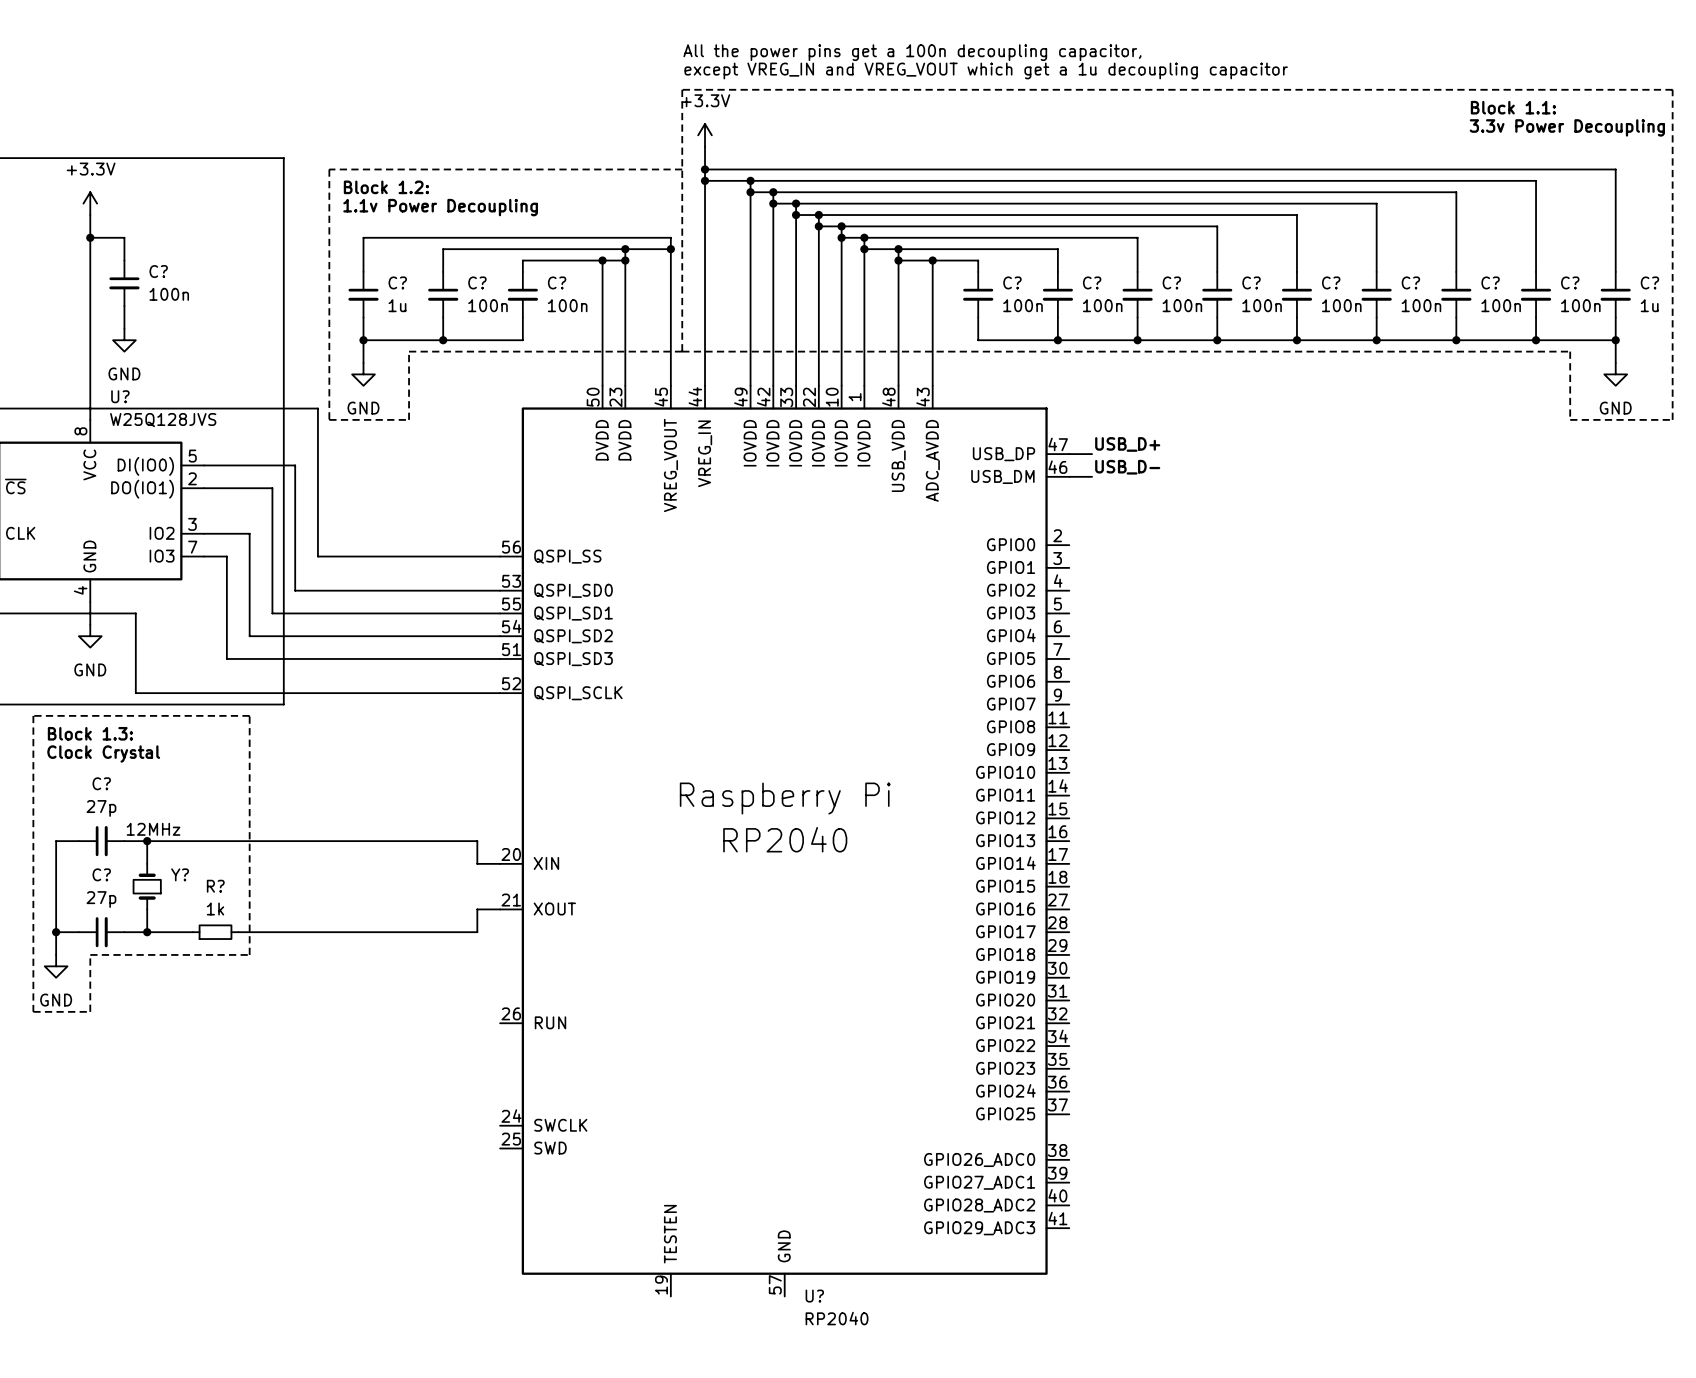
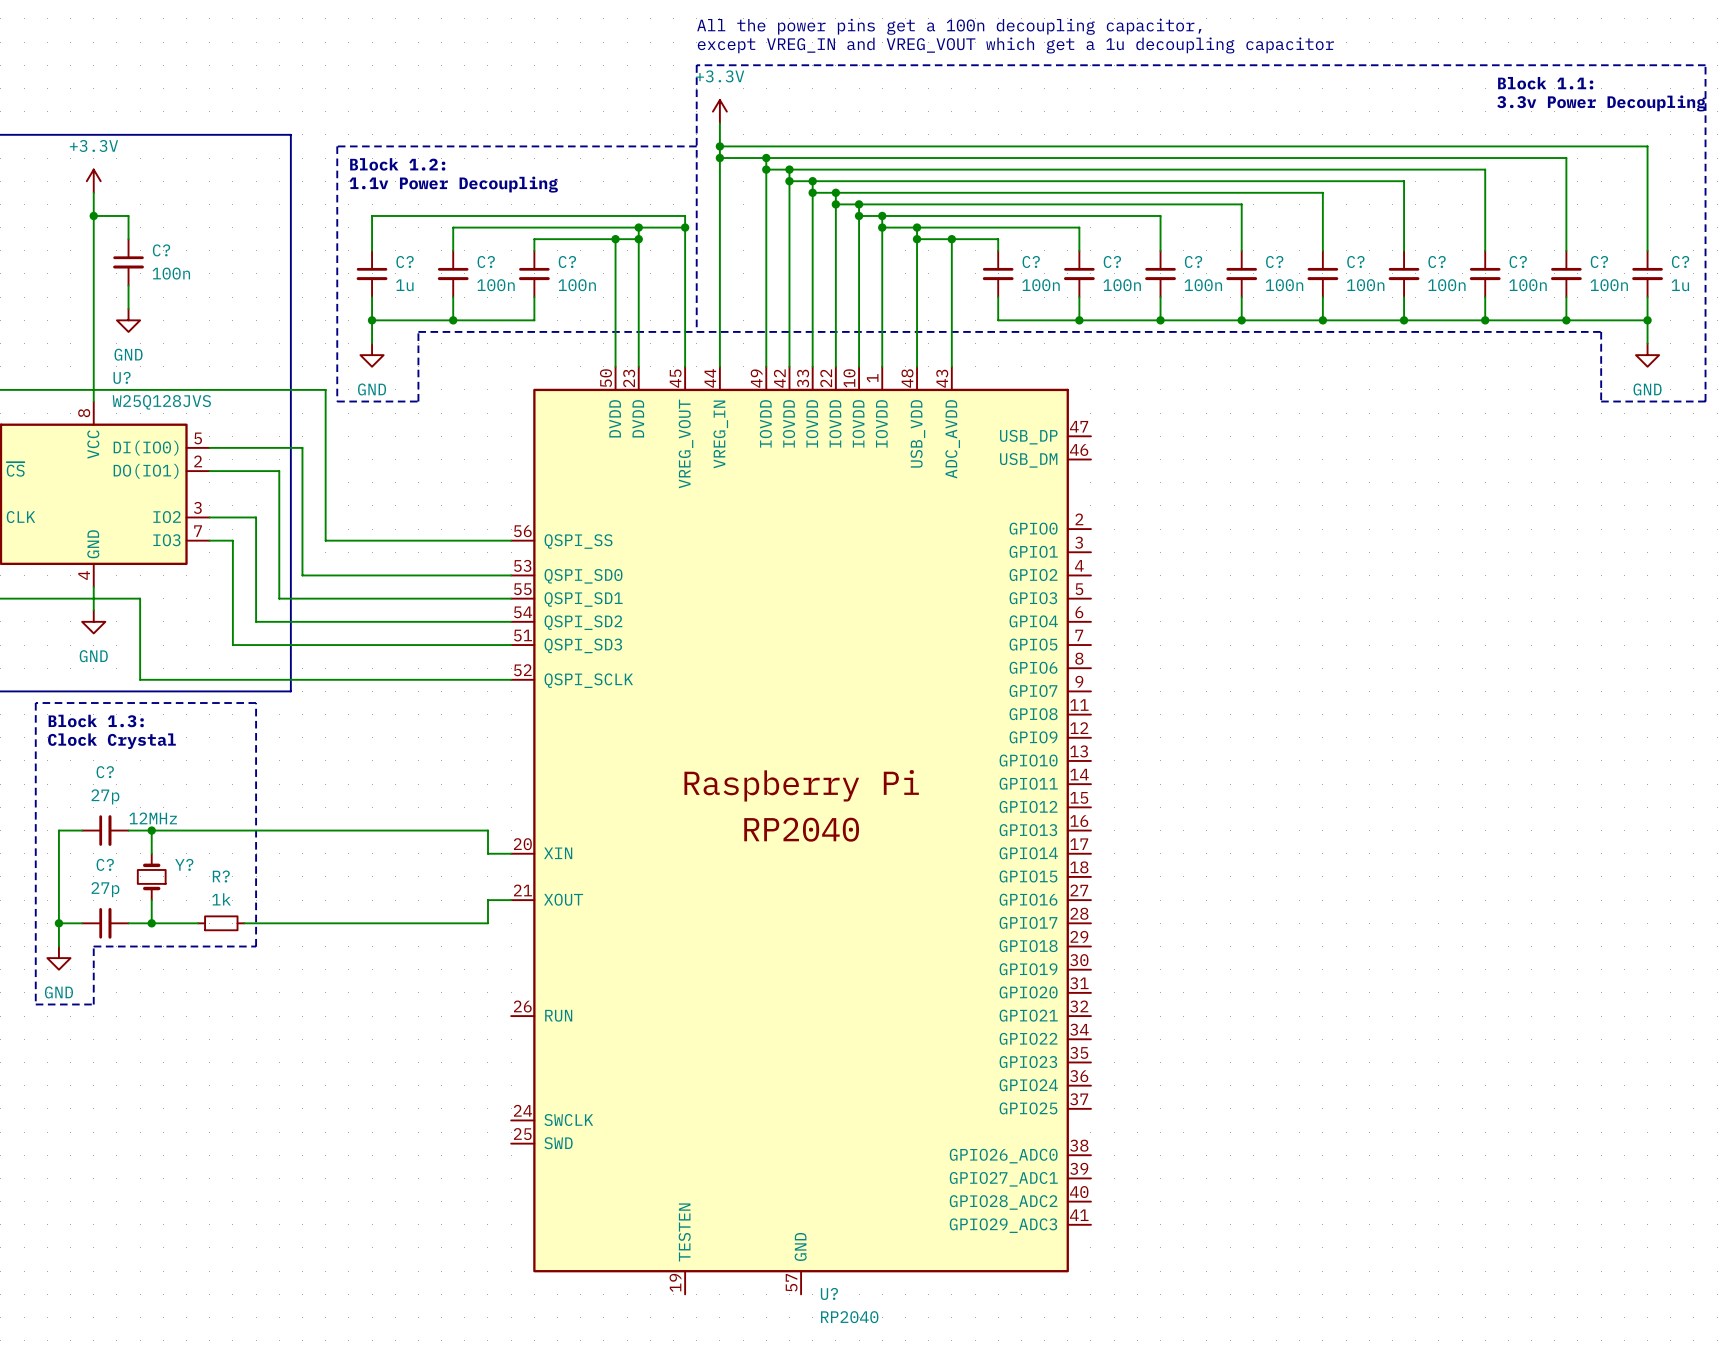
label: USB_D+ (1127, 444) -> none
wire: (1069, 454) (1092, 454) -> none
label: USB_D- (1127, 467) -> none
wire: (1069, 476) (1092, 476) -> none

